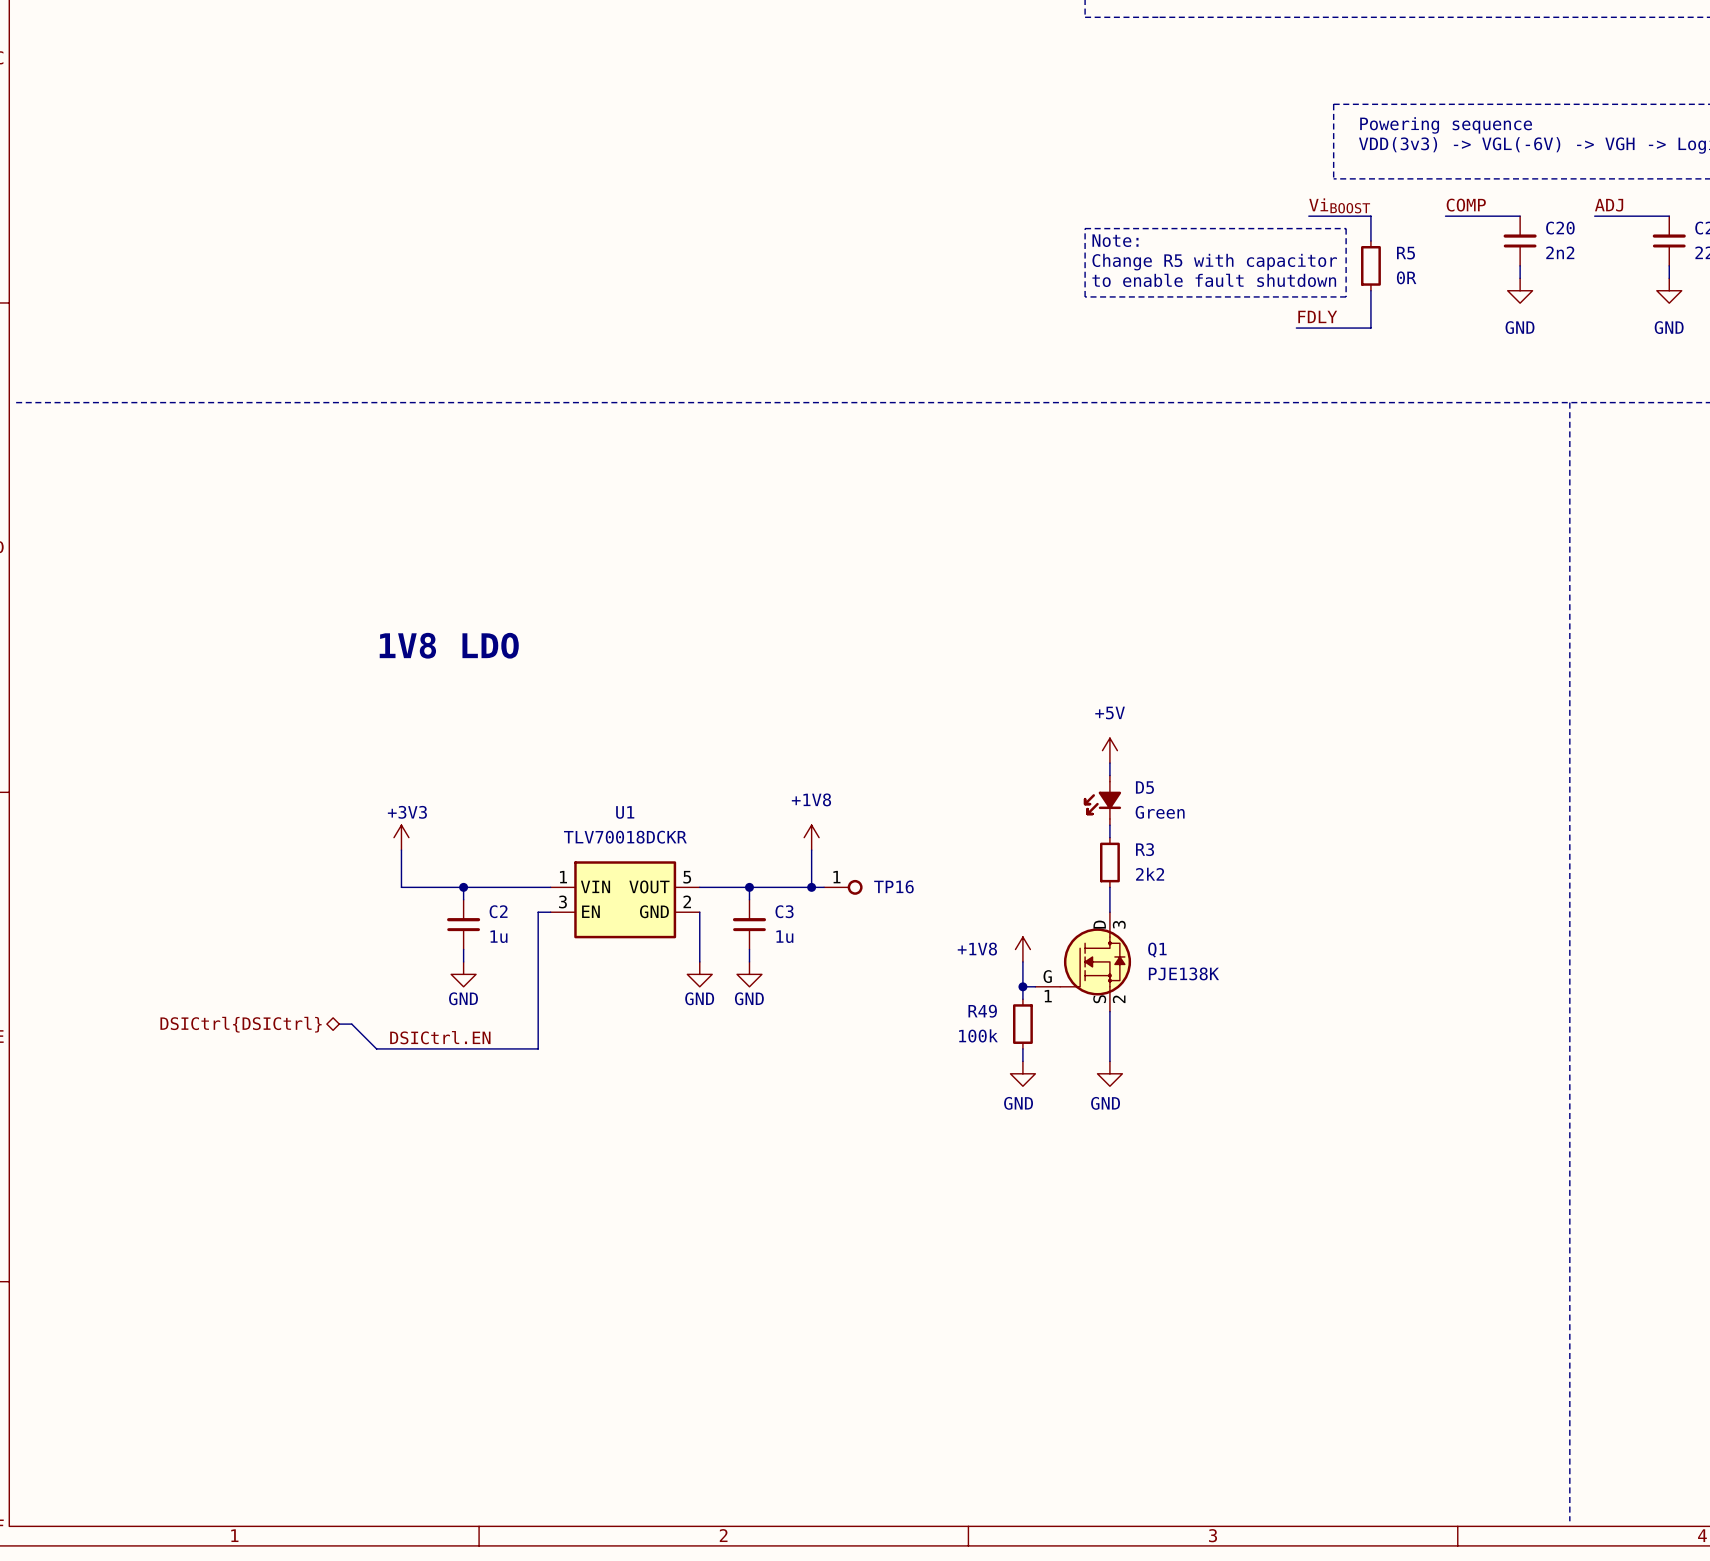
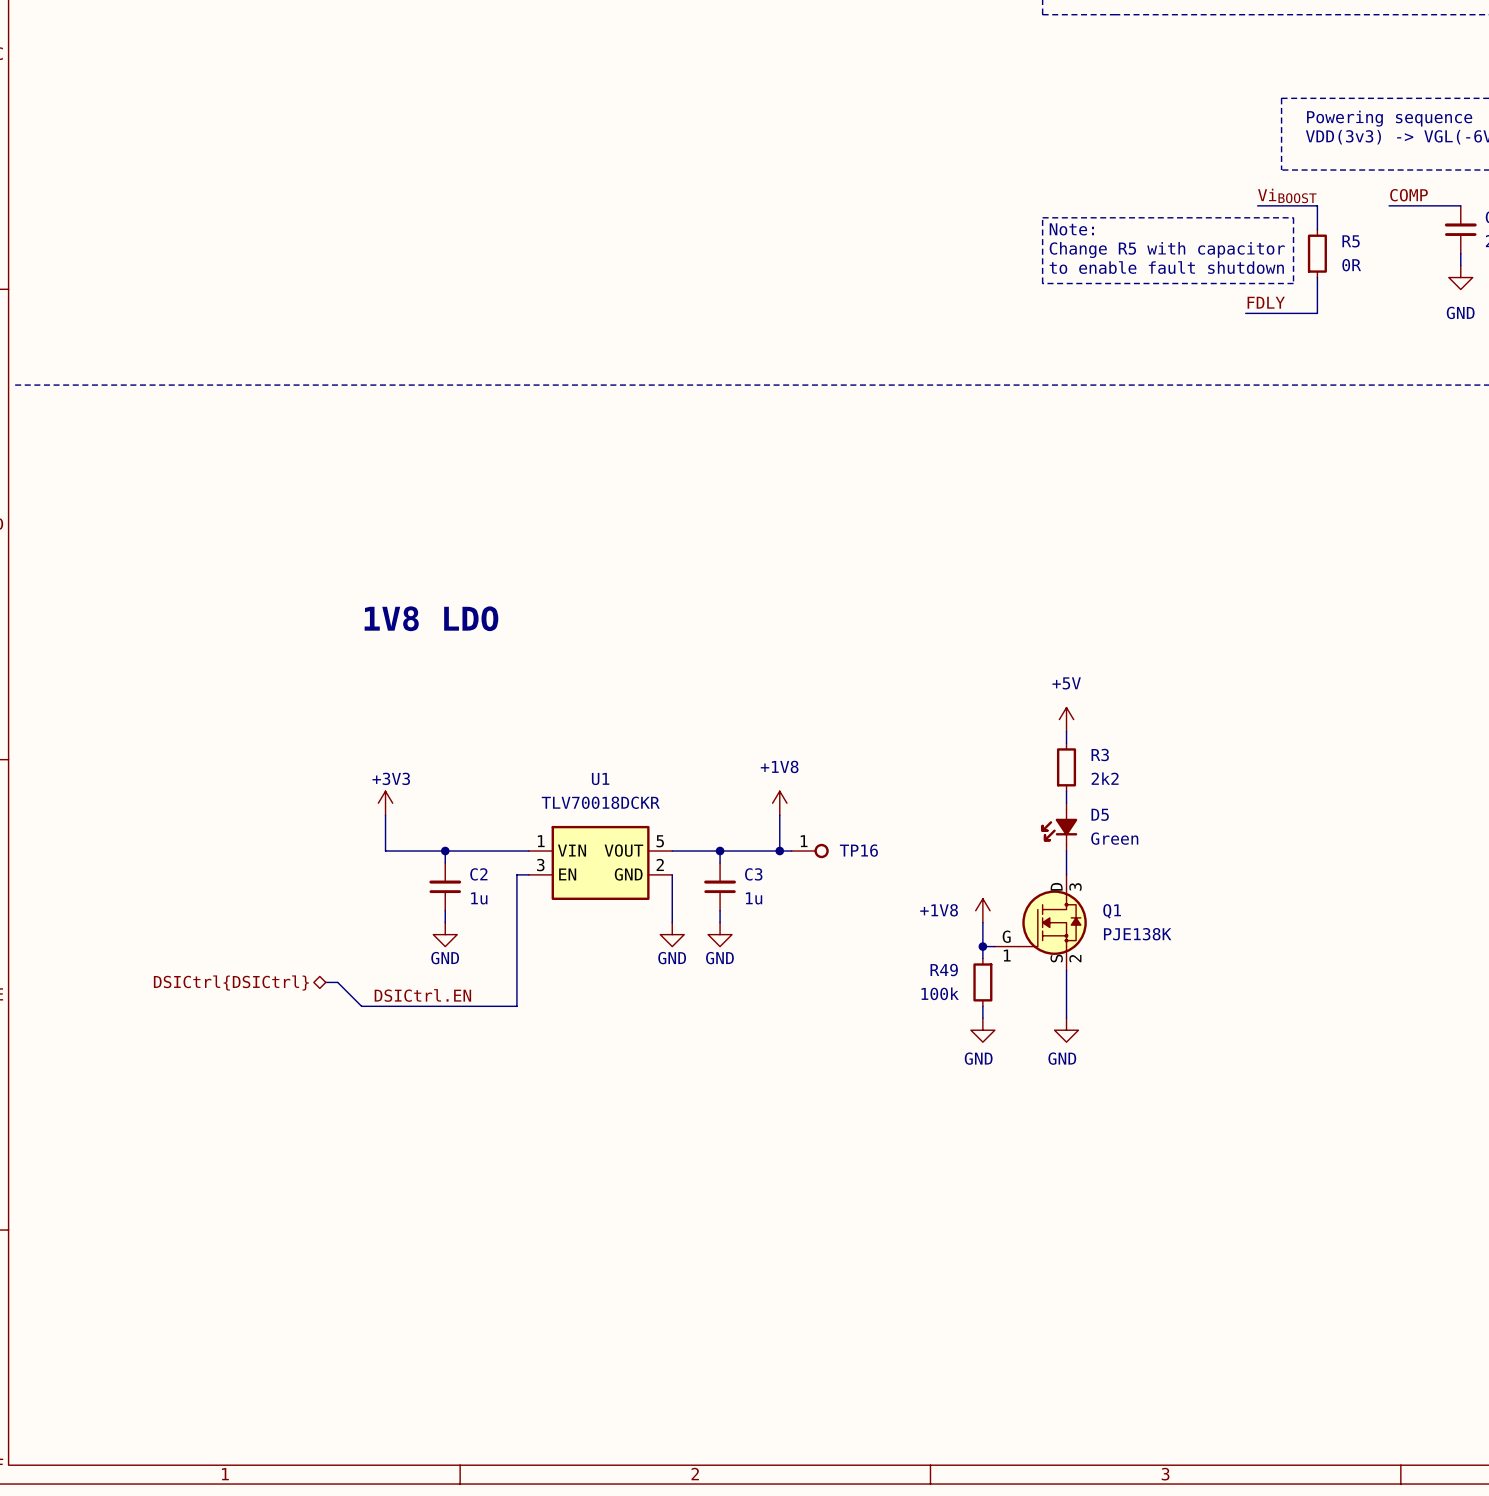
D5 position: (1102, 800) -> (1059, 827)
R3 position: (1109, 862) -> (1066, 767)

